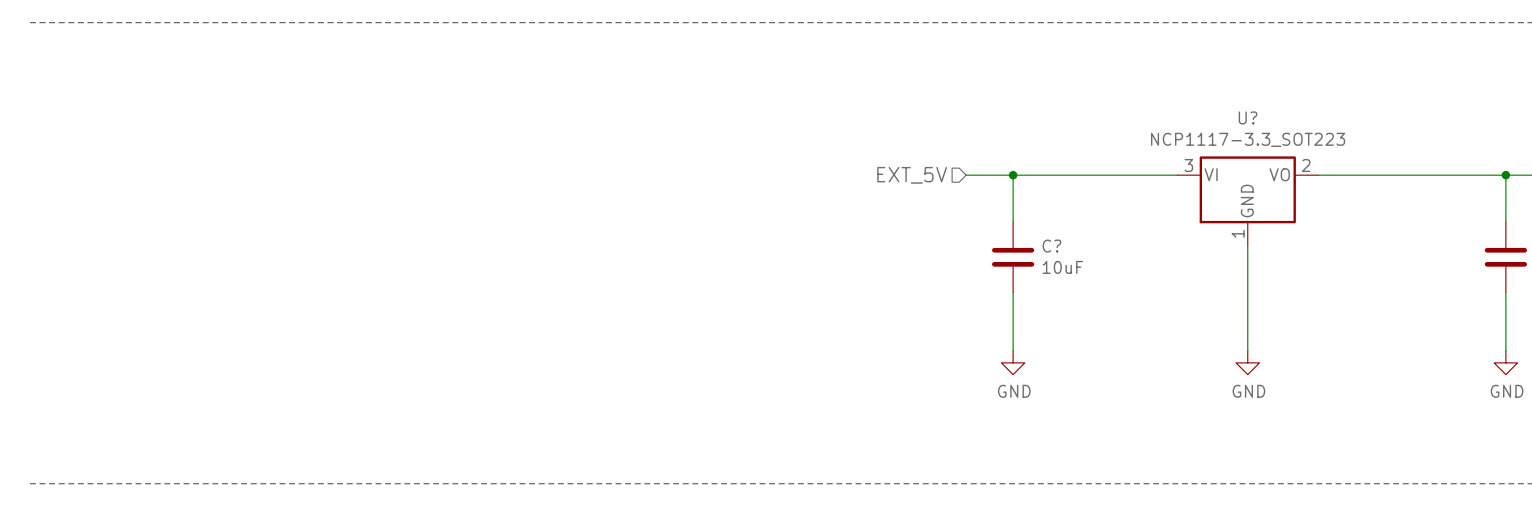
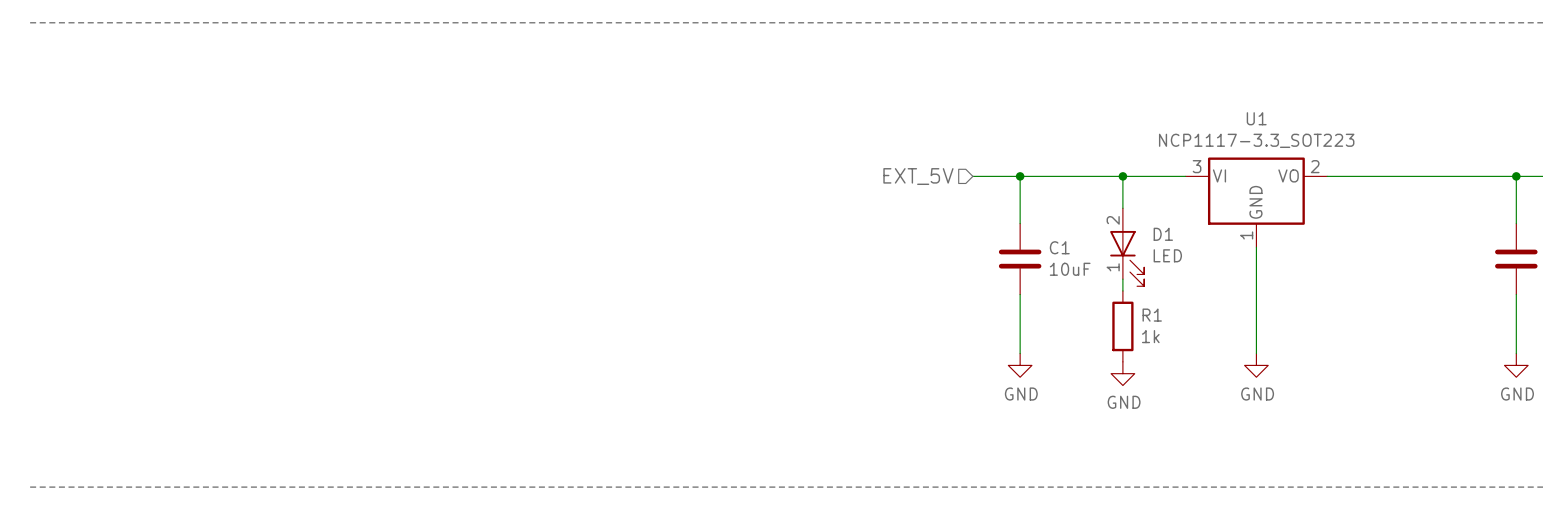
U? name: U? (1248, 117) -> U1 (1256, 118)
wire: none -> (1122, 176) (1122, 208)
junction: none -> (1122, 176)
D1: none -> LED (1127, 247)
C? name: C? (1051, 246) -> C1 (1059, 247)
wire: none -> (1122, 279) (1122, 290)
R1: none -> 1k (1122, 326)
power symbol: none -> GND (1122, 373)

